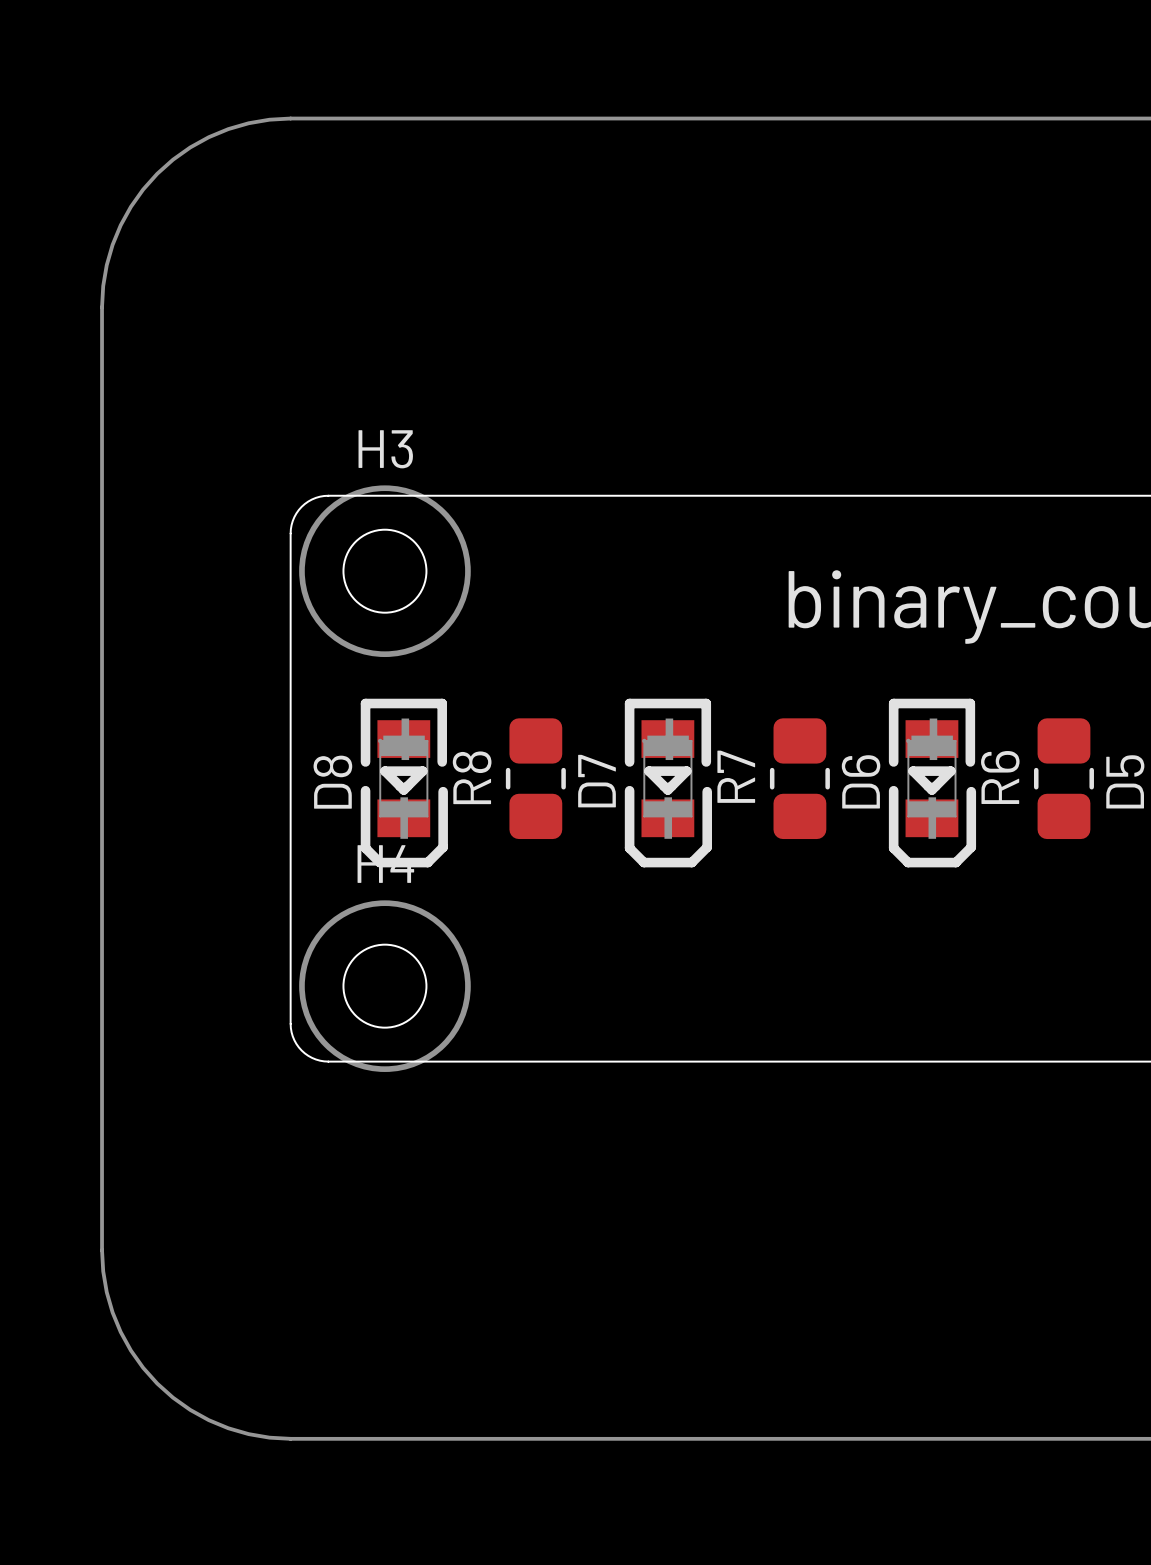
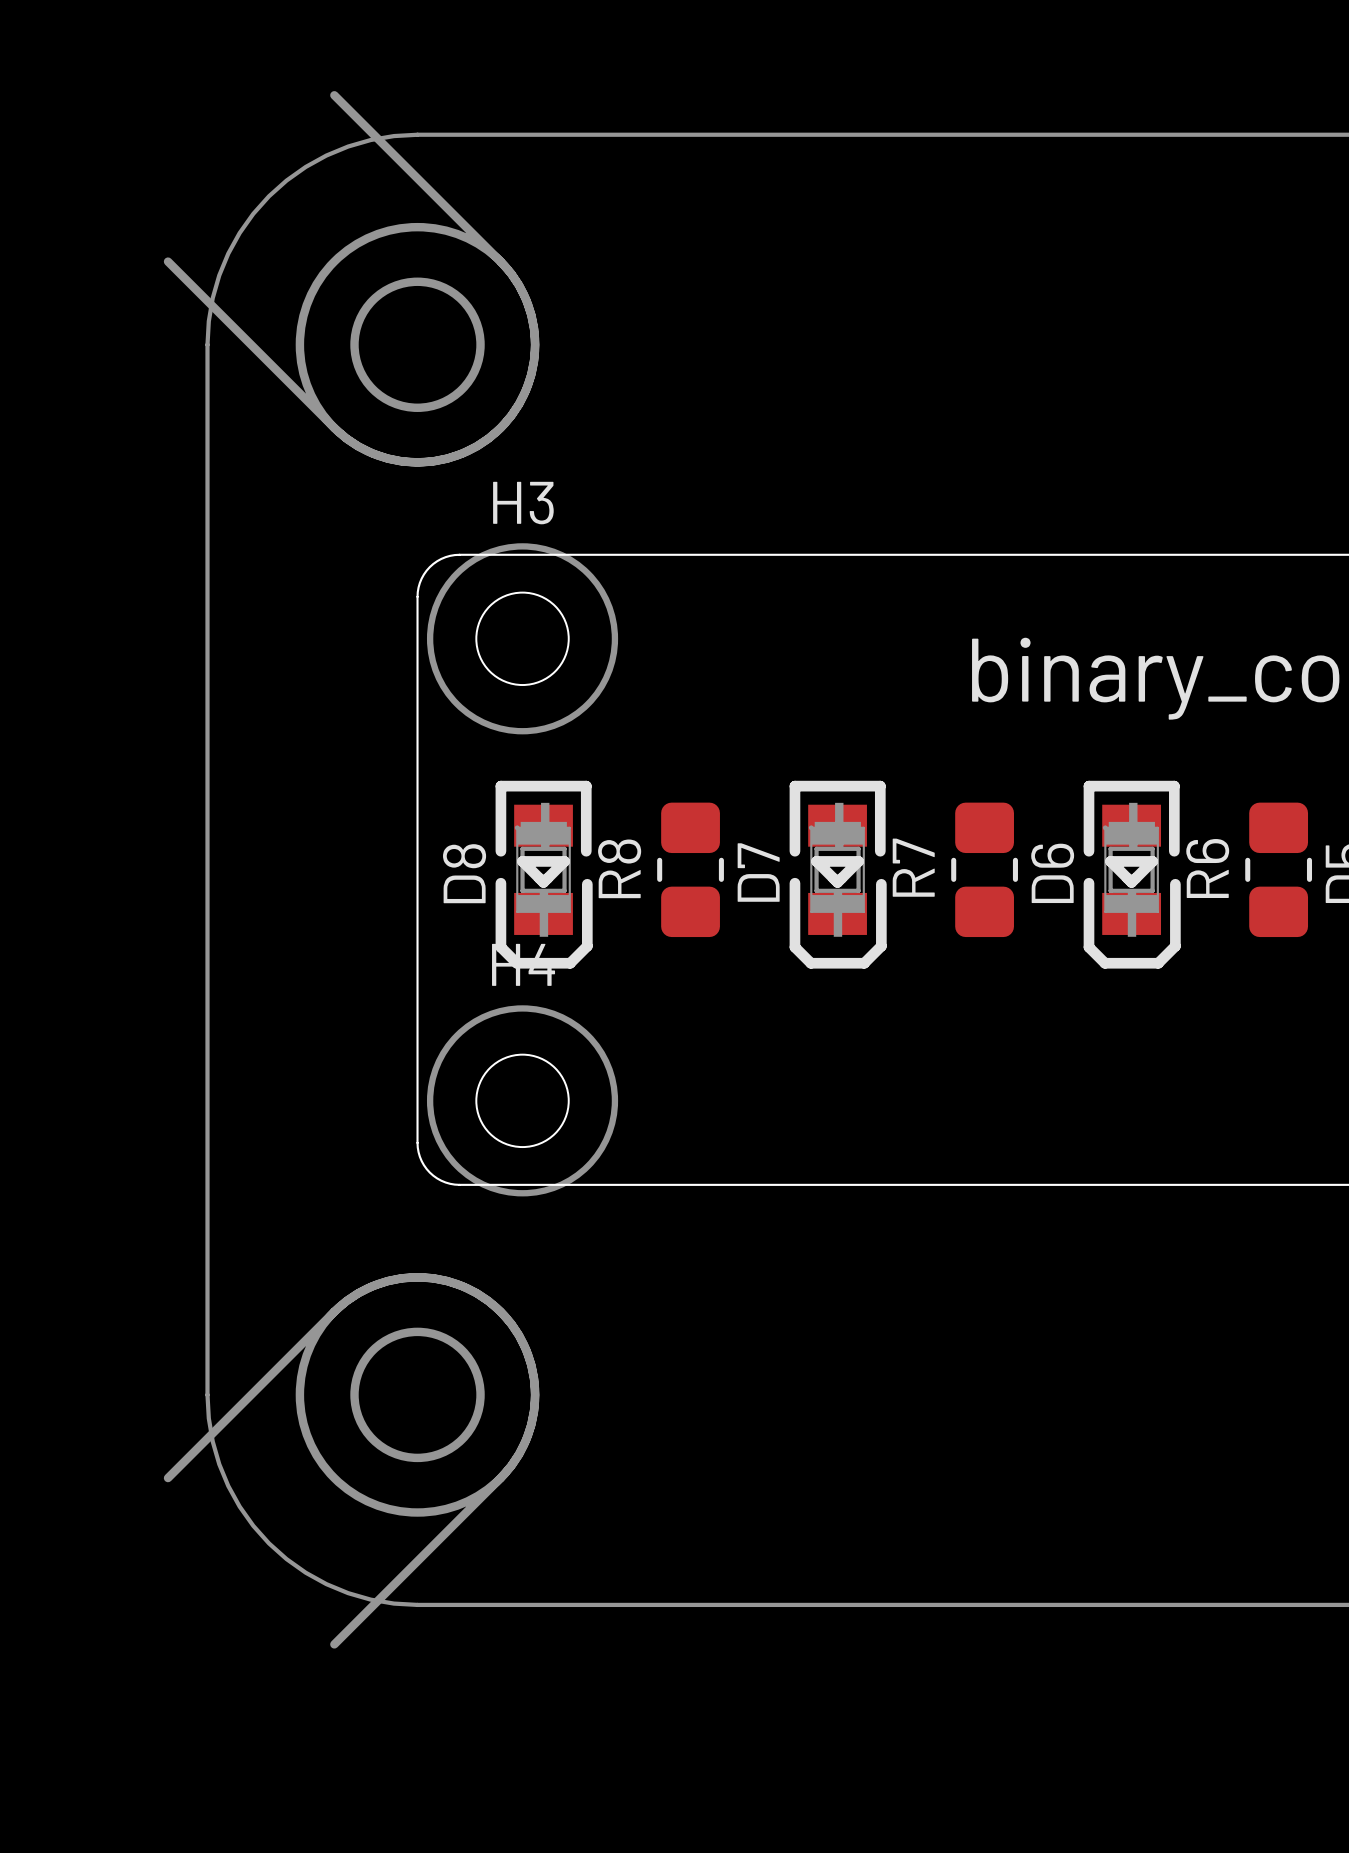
drawing: none -> [163, 91, 540, 467]
line: none -> (522, 848) (564, 848) (564, 890) (522, 890) (522, 848)
line: none -> (816, 848) (858, 848) (858, 890) (816, 890) (816, 848)
line: none -> (1110, 848) (1152, 848) (1152, 890) (1110, 890) (1110, 848)
drawing: none -> [163, 1273, 540, 1649]

